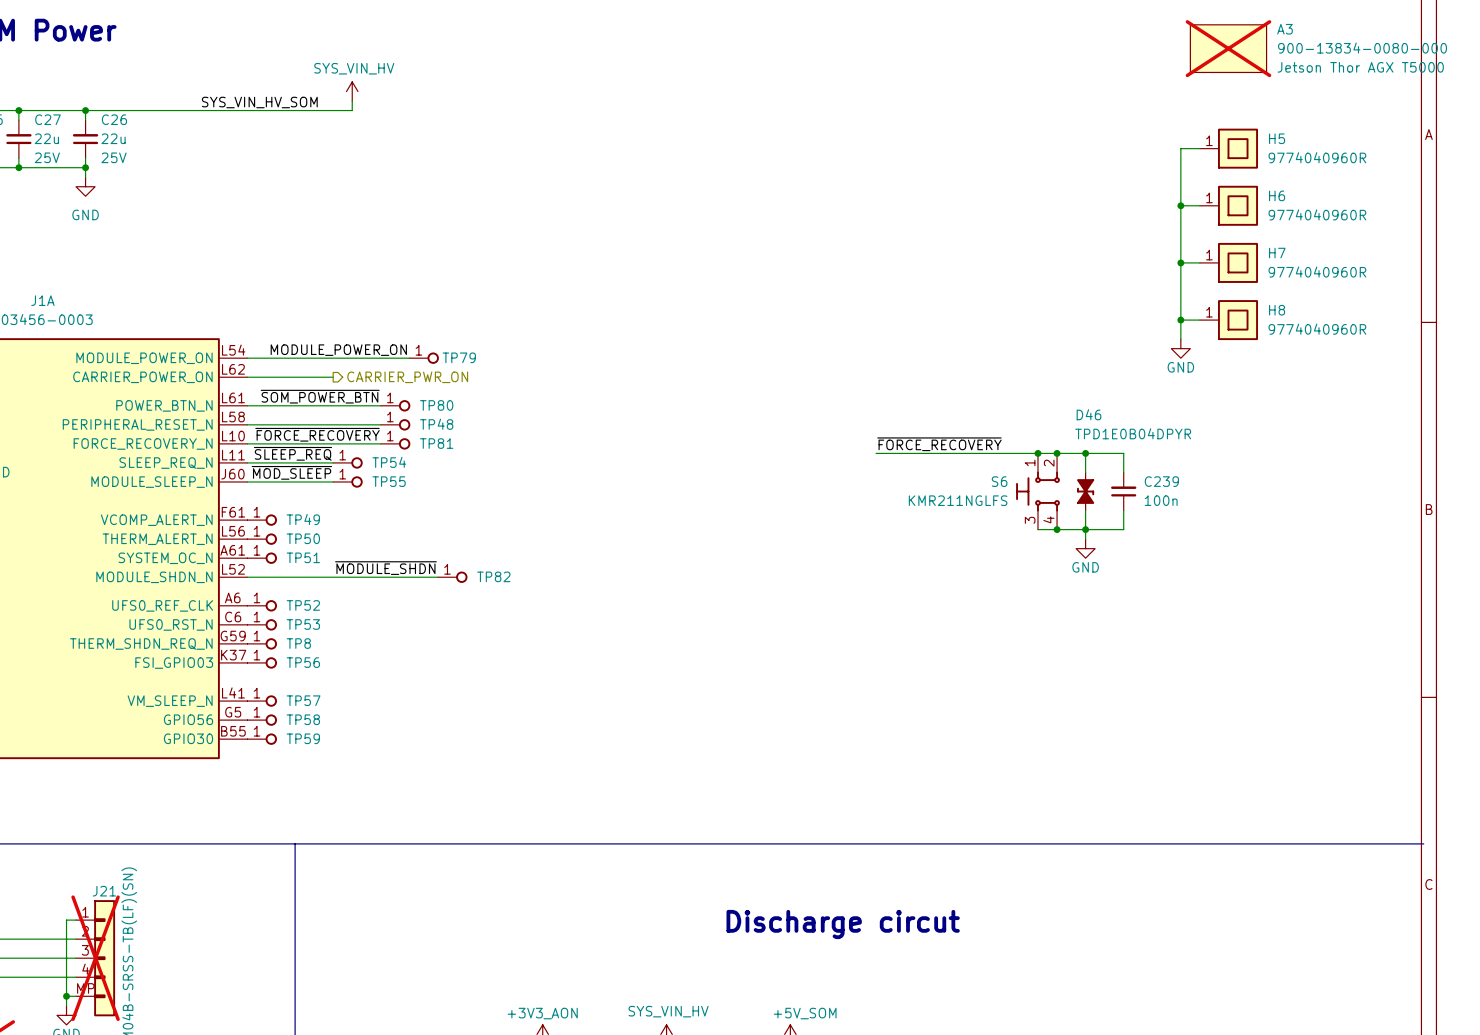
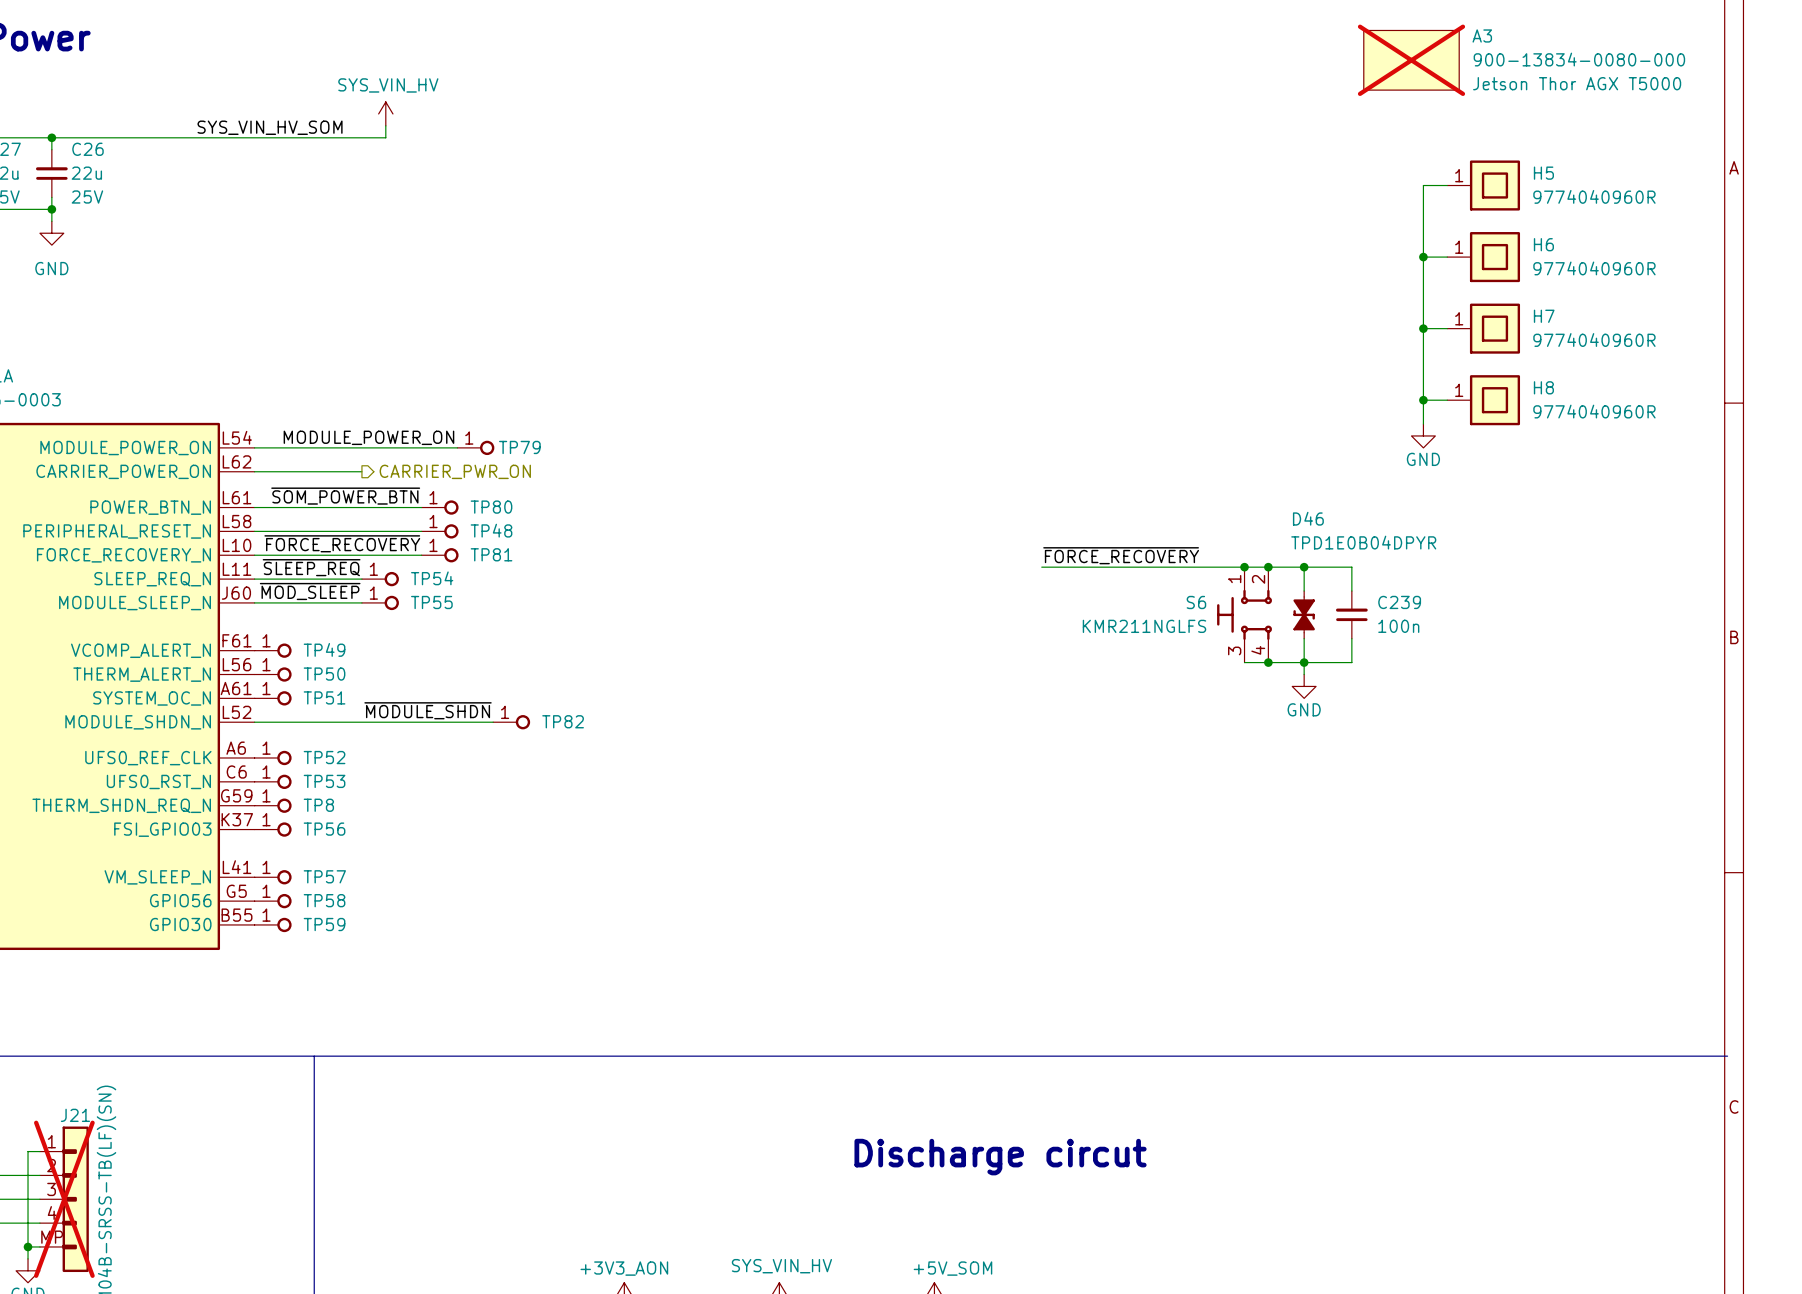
A3 position: (1228, 48) -> (1411, 60)

